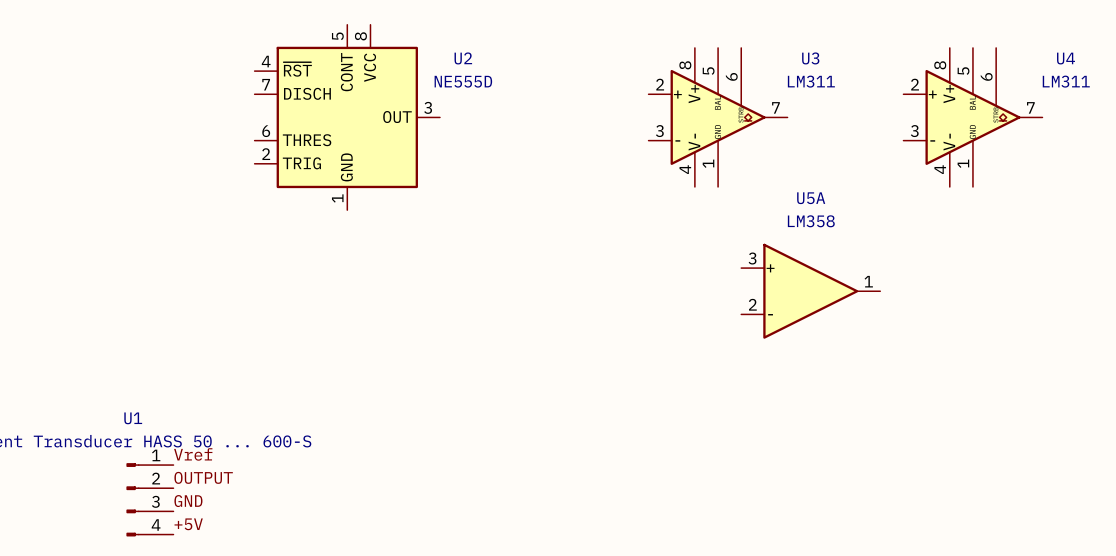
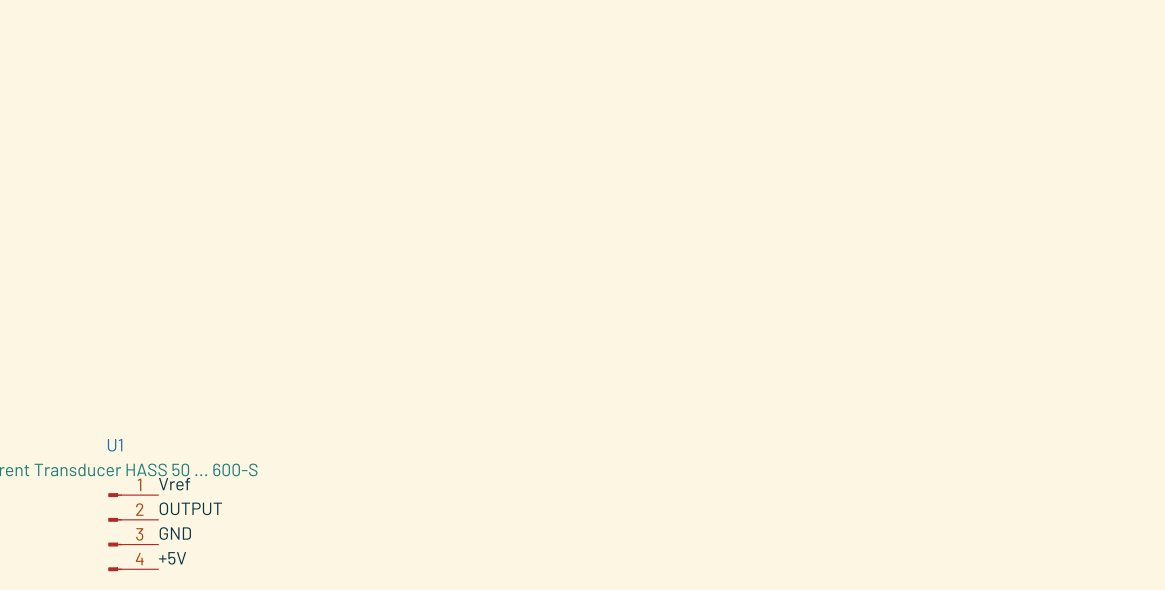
U2: NE555D (347, 117) -> none
U3: LM311 (718, 117) -> none
U4: LM311 (972, 117) -> none
U5A: LM358 (810, 291) -> none

